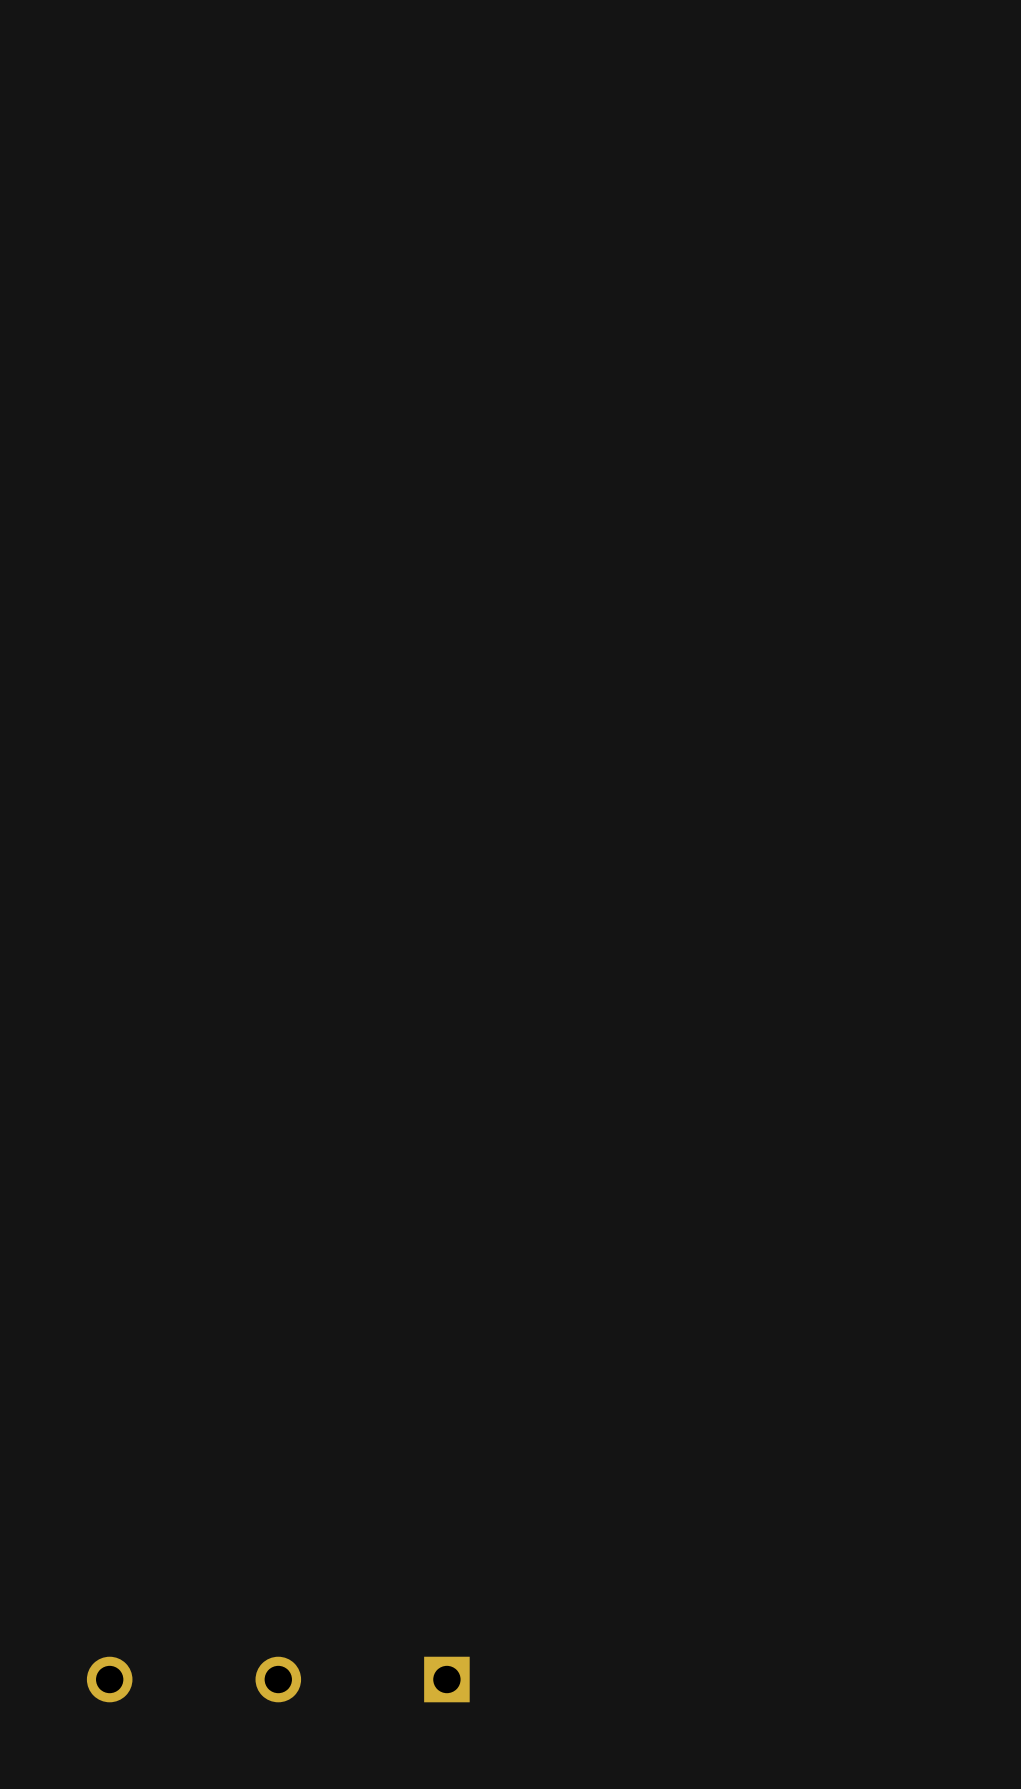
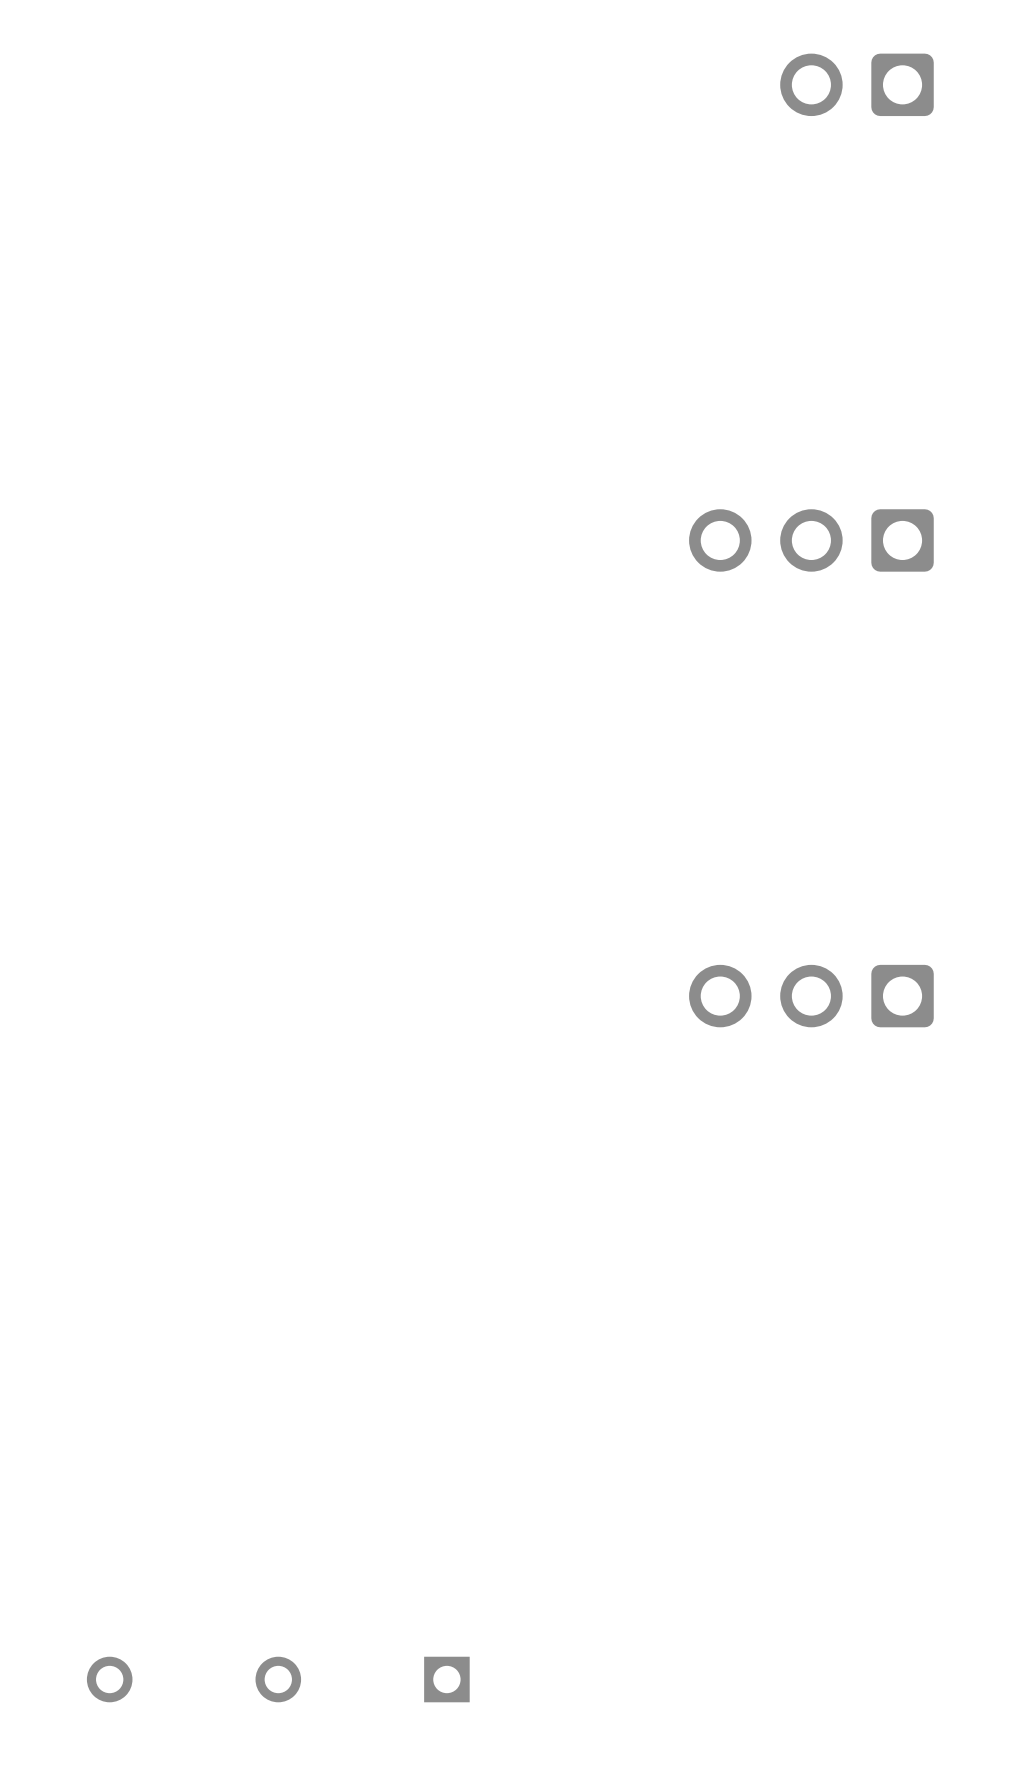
part: none -> (856, 84)
part: none -> (811, 540)
part: none -> (811, 996)

